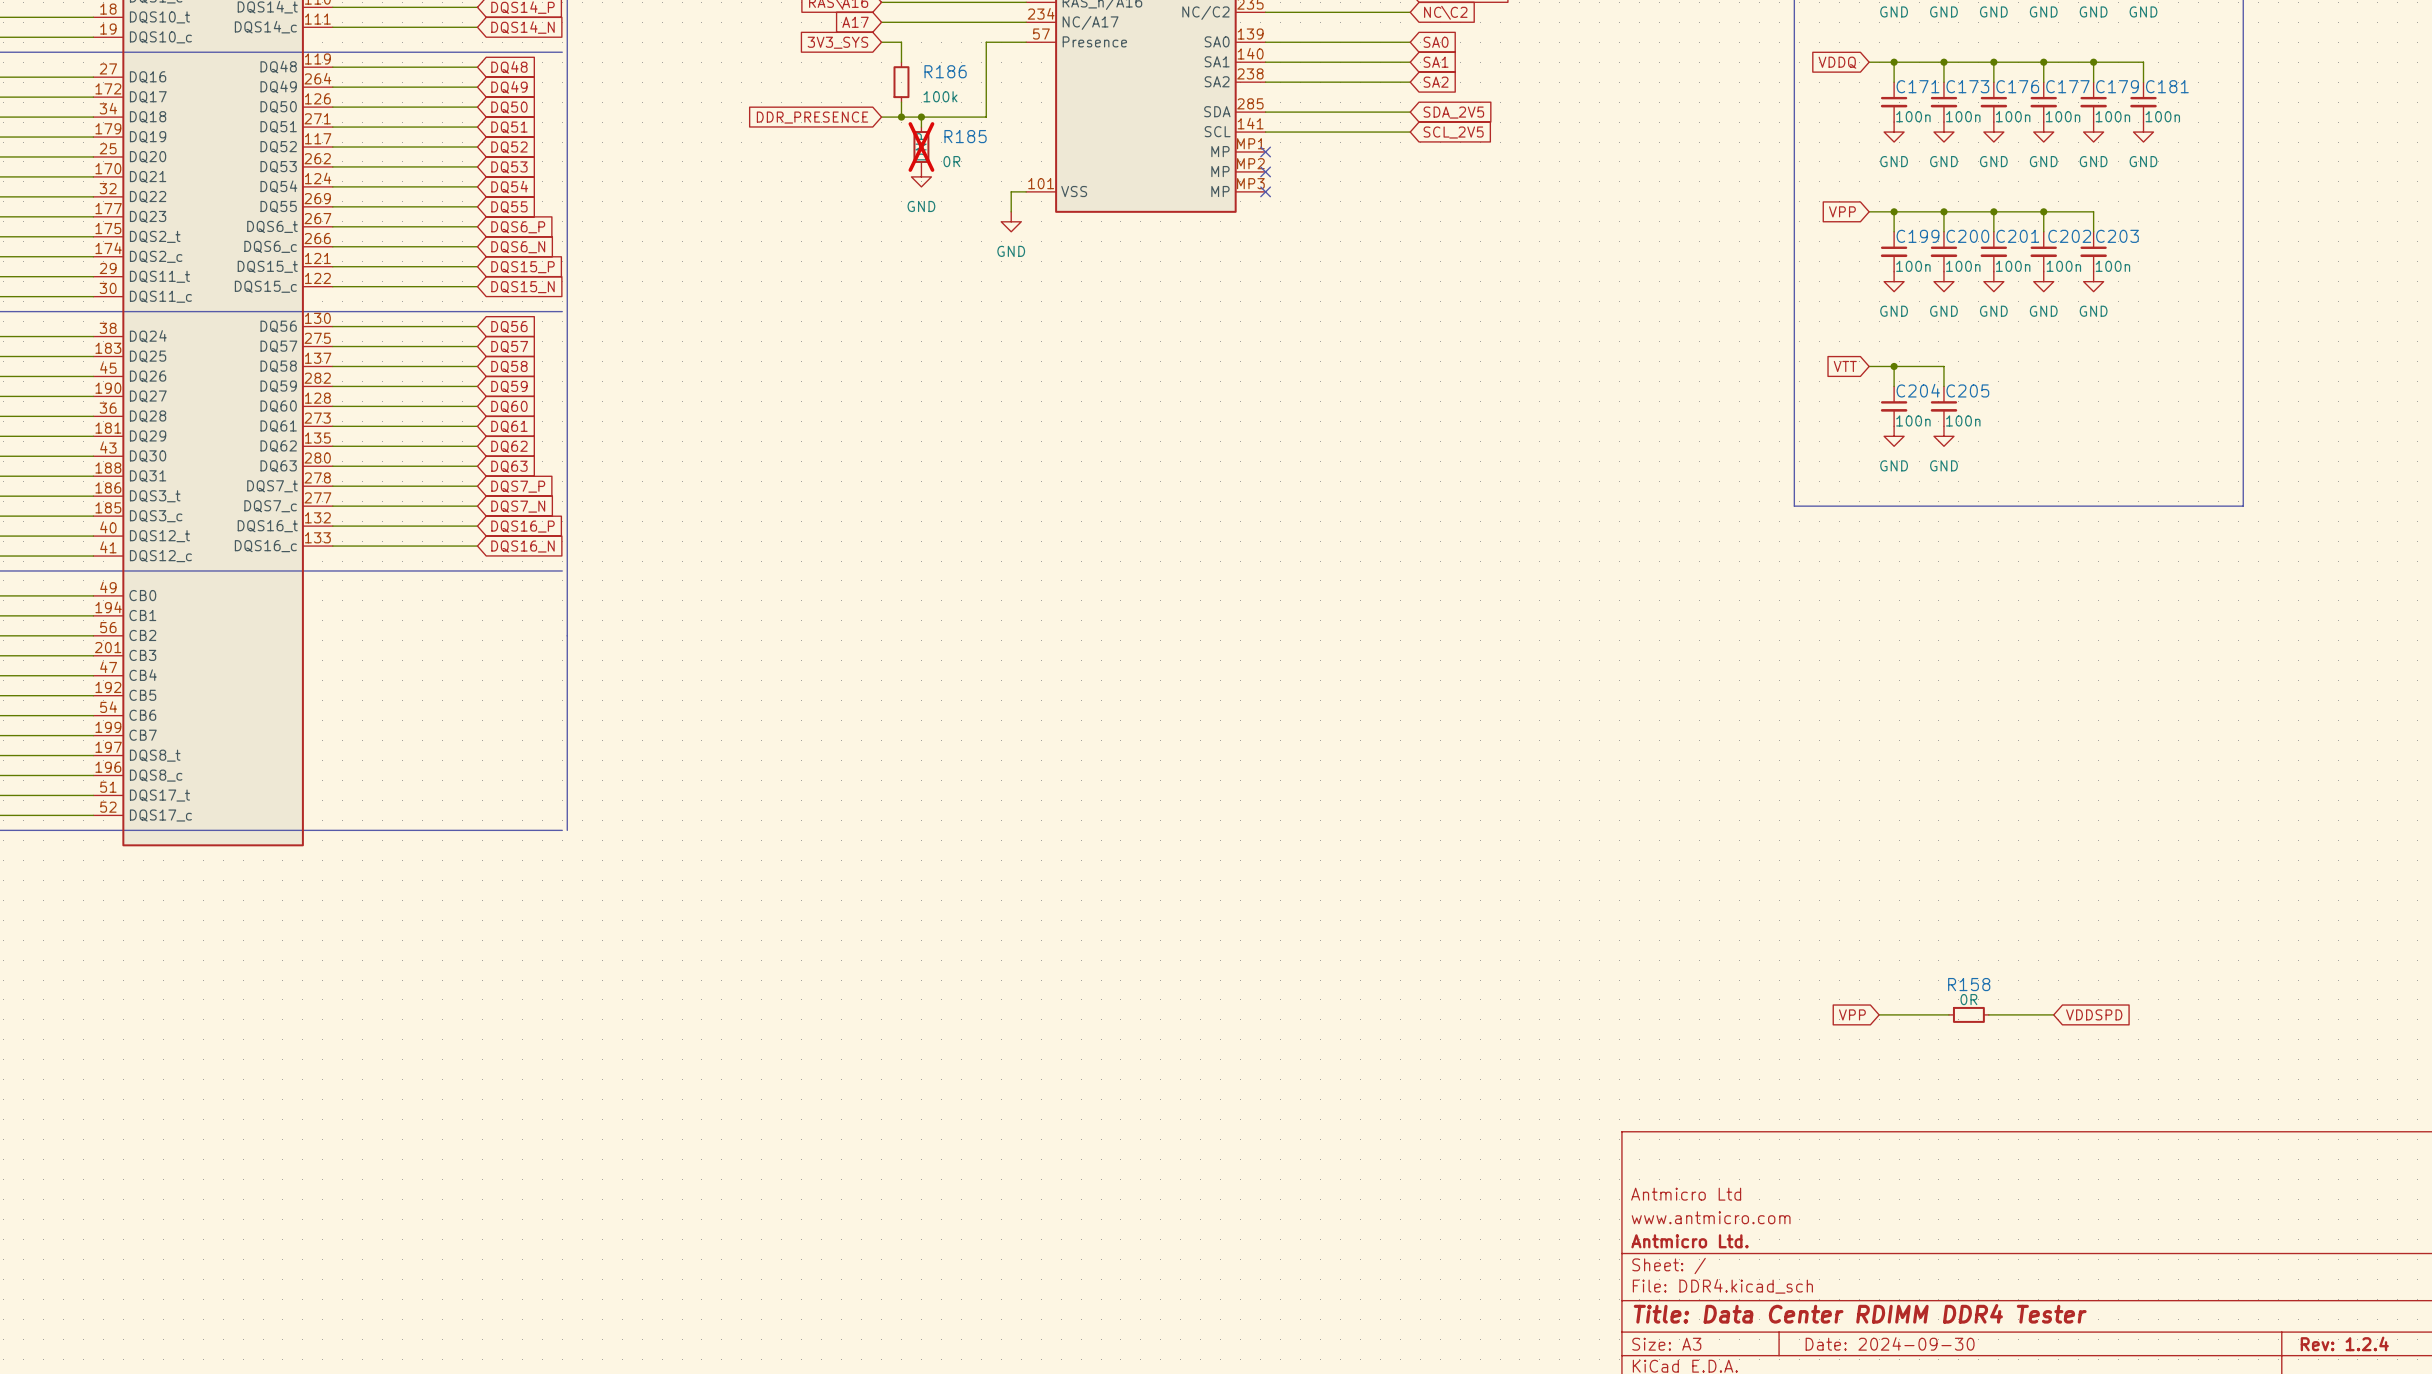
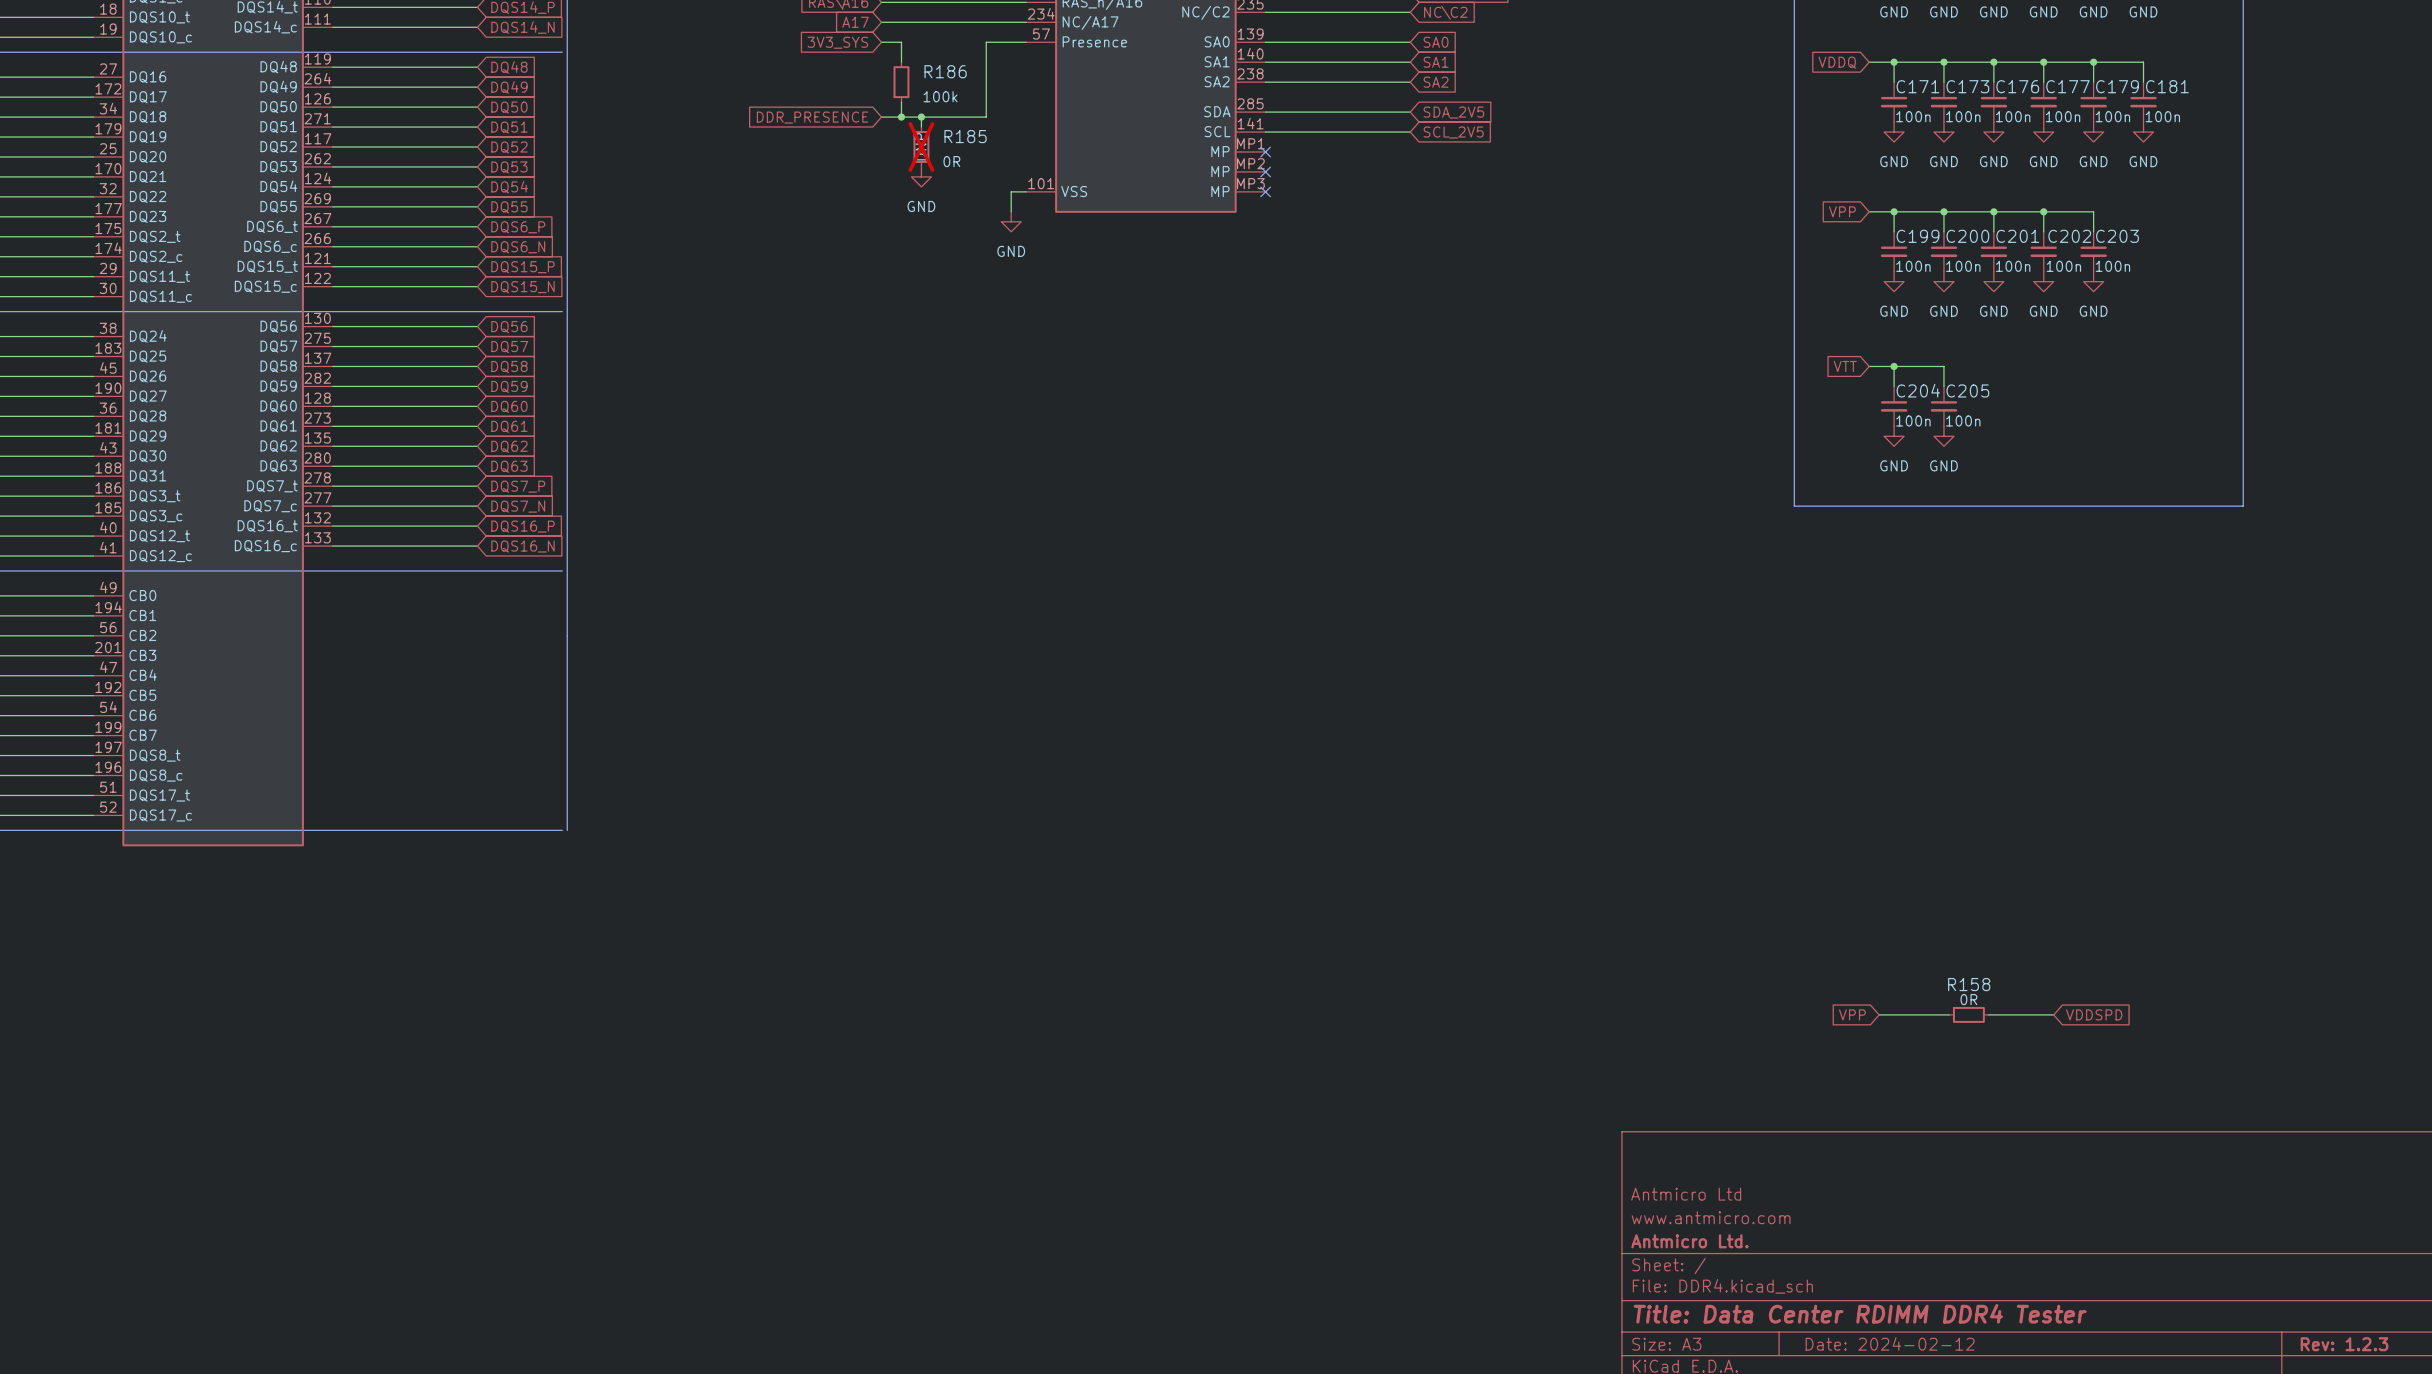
title block: Date: 2024-09-30 (1890, 1343) -> Date: 2024-02-12 (1890, 1343)
title block: Rev: 1.2.4 (2344, 1343) -> Rev: 1.2.3 (2344, 1344)

